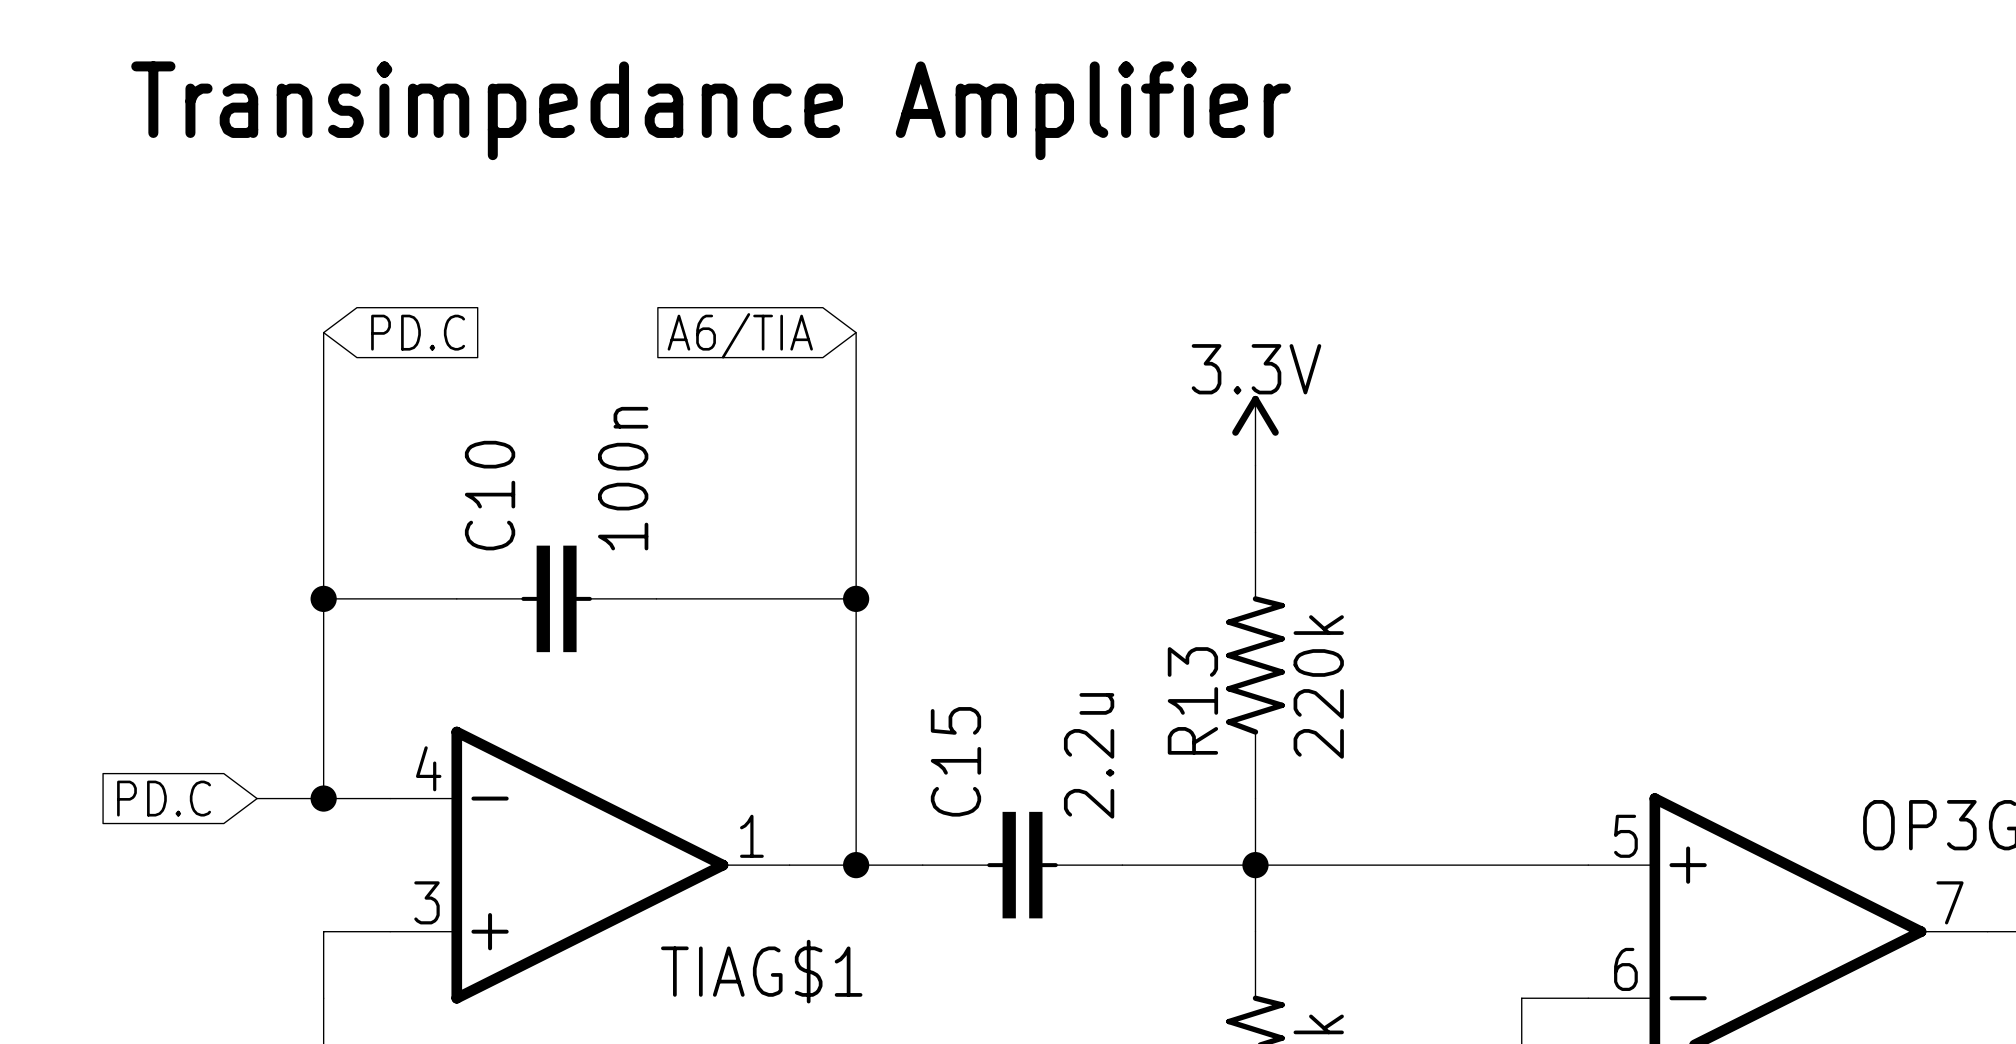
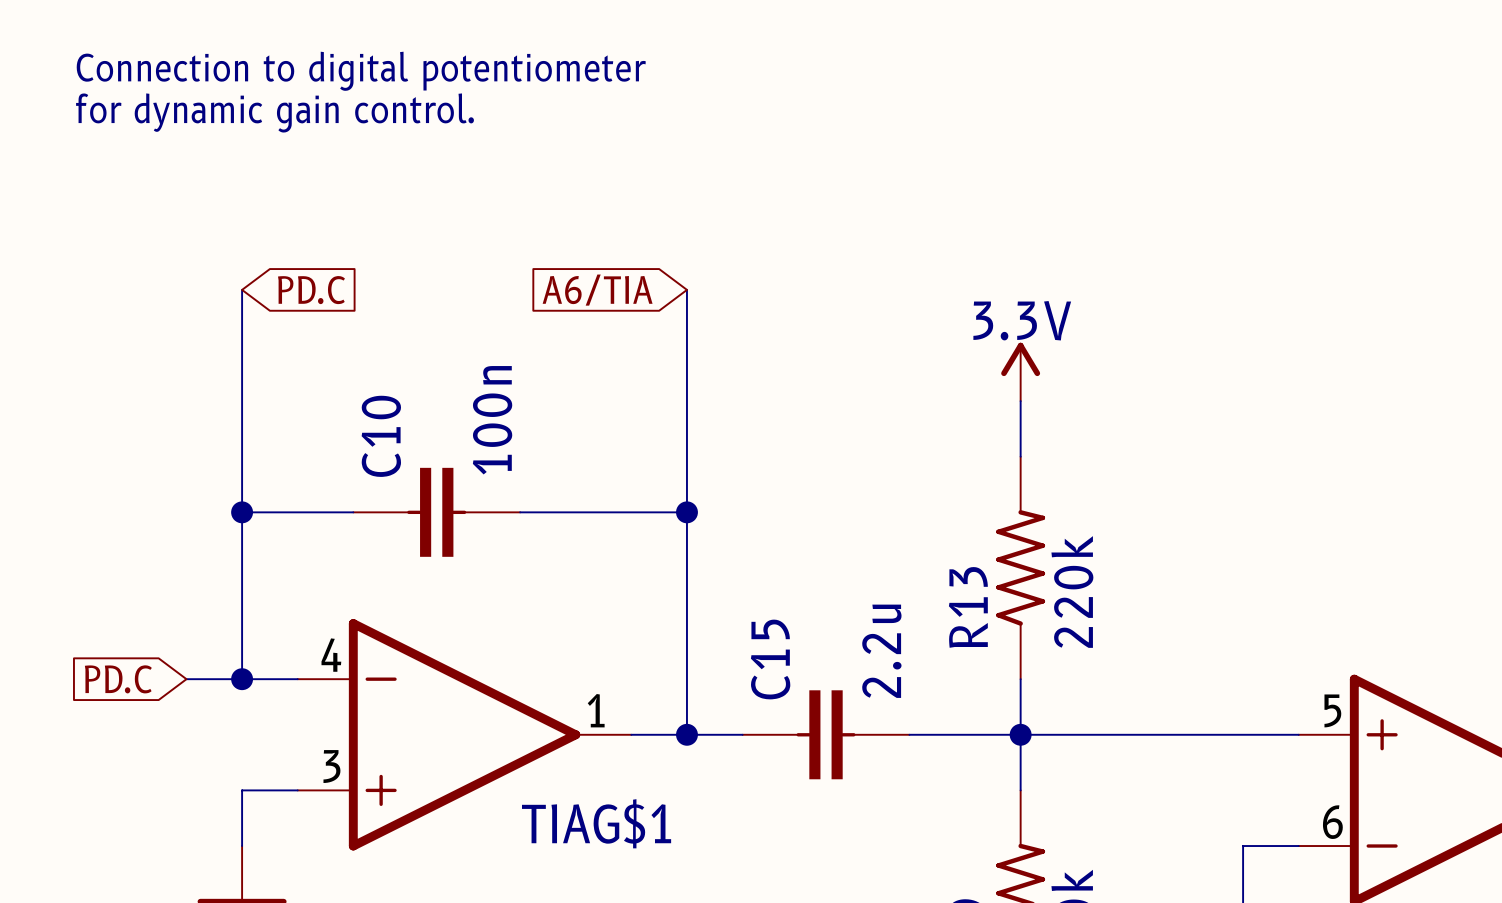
text: none -> Connection to digital potentiometer (361, 71)
text: Transimpedance Amplifier (711, 110) -> for dynamic gain control. (275, 112)

